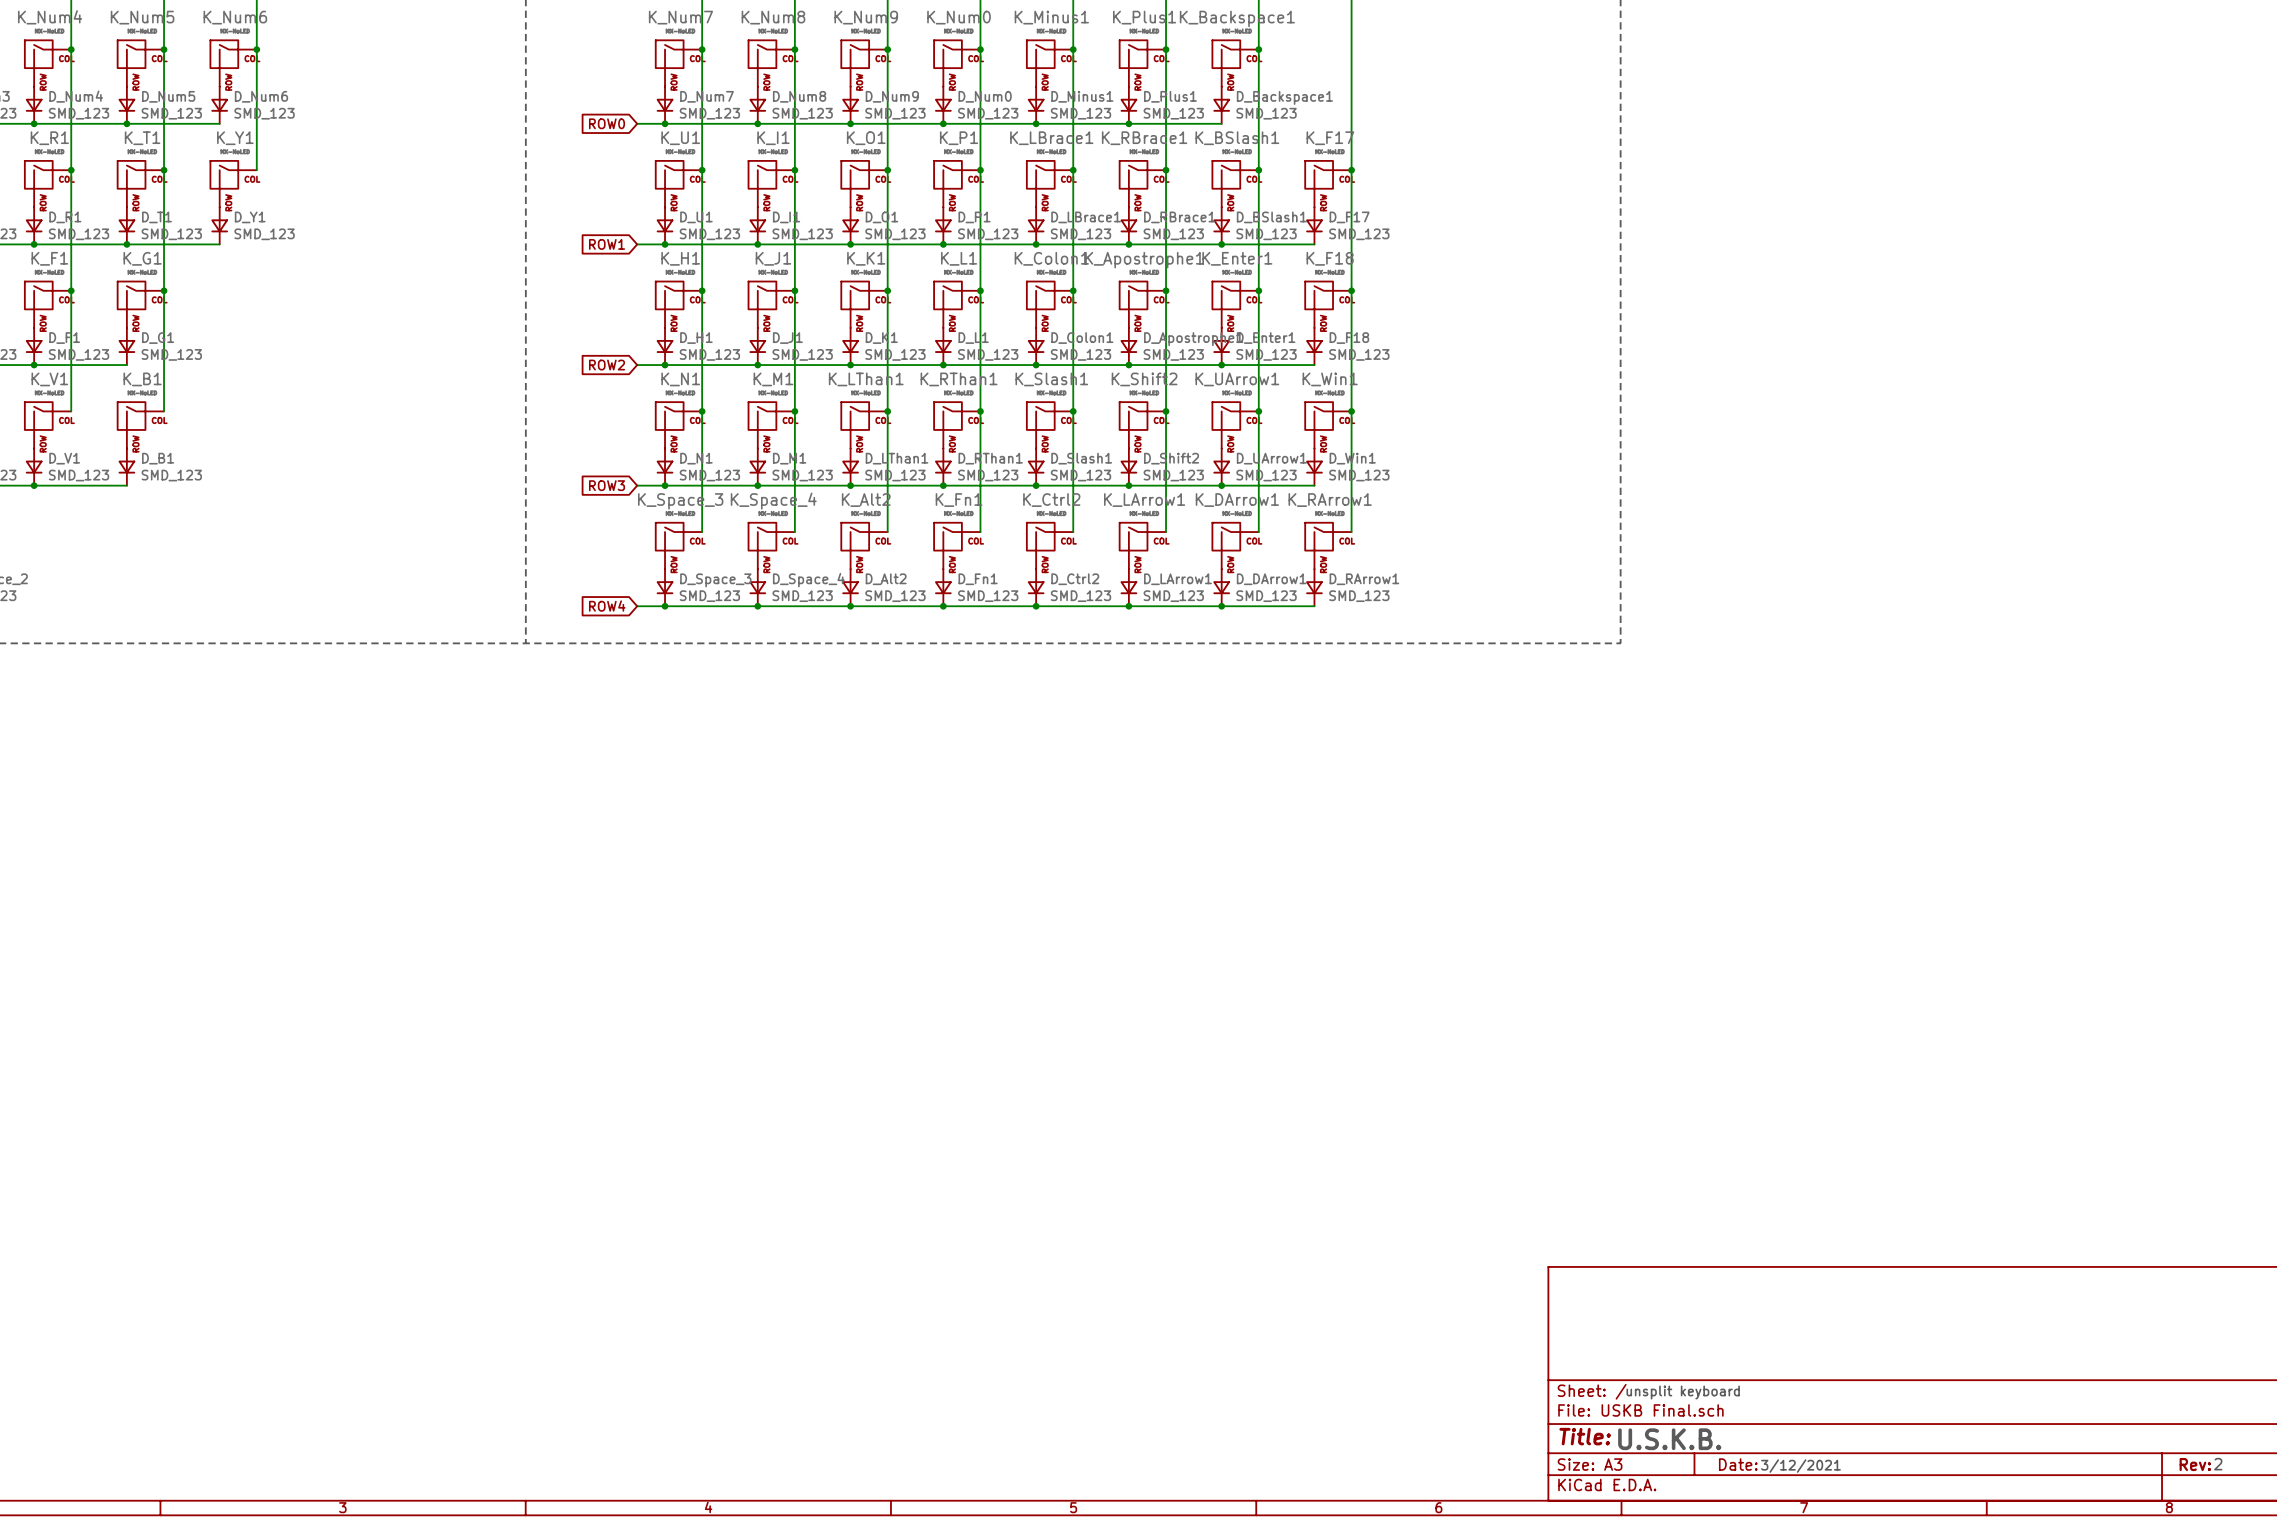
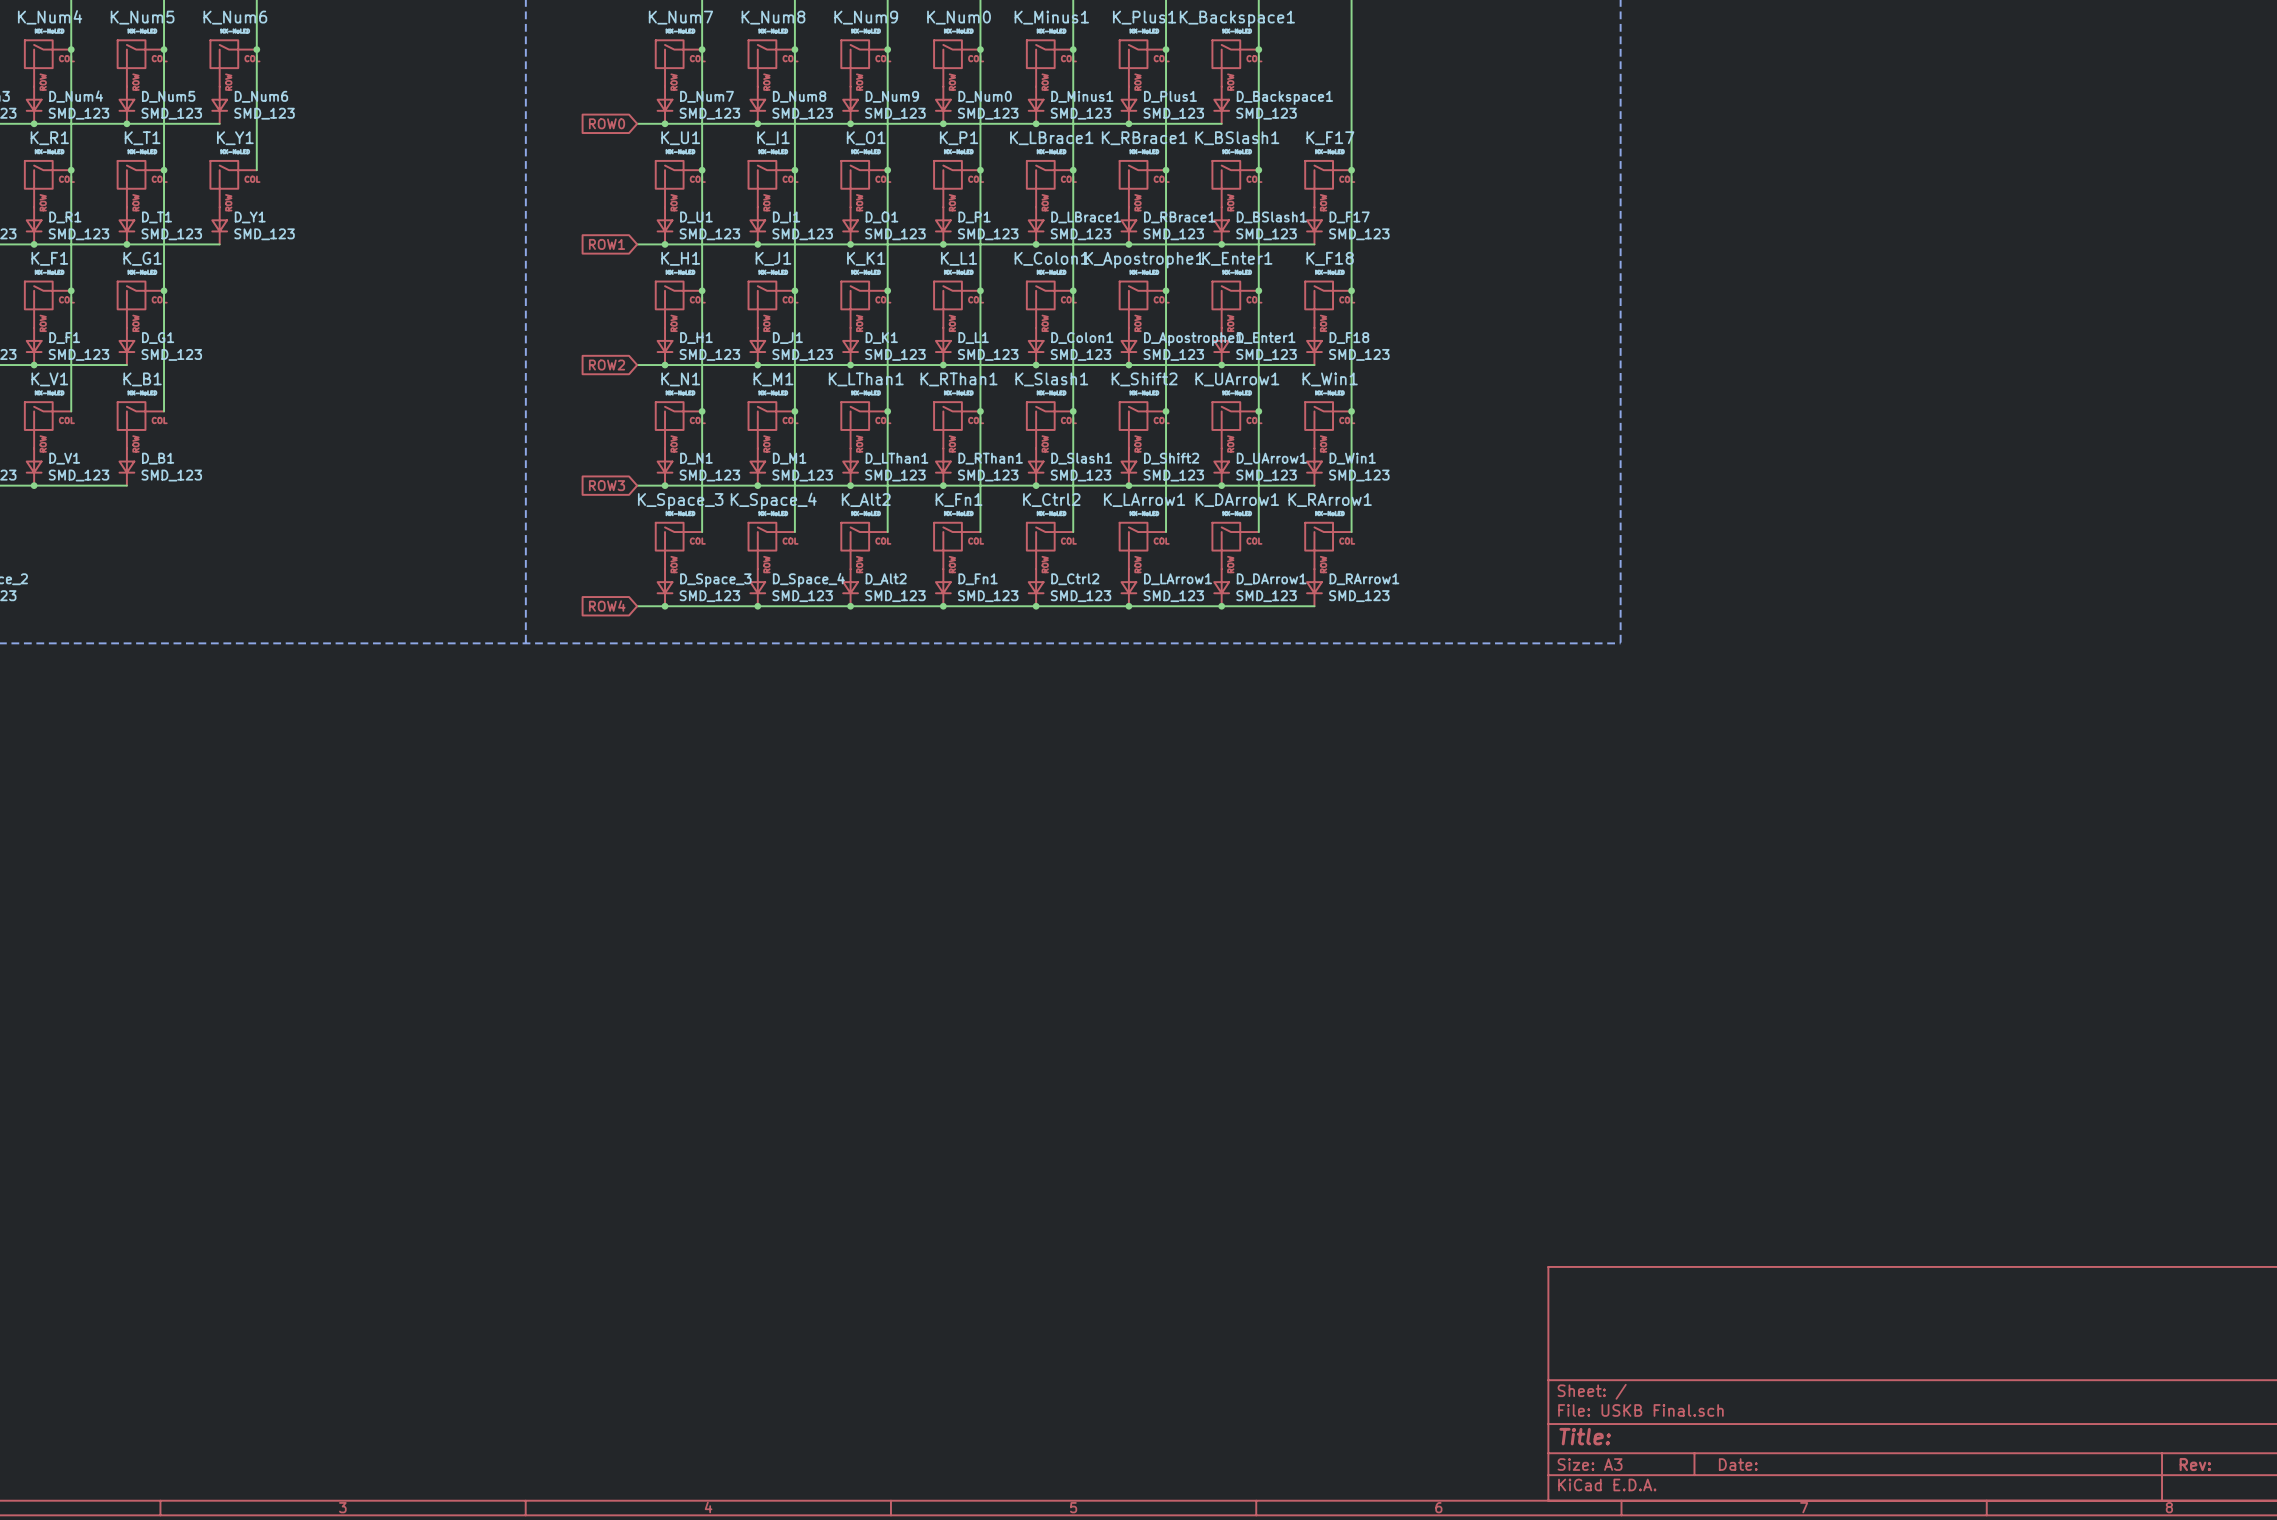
text: unsplit keyboard (1683, 1392) -> none
text: U.S.K.B. (1669, 1439) -> none
text: 2 (2218, 1464) -> none
text: 3/12/2021 (1800, 1466) -> none

